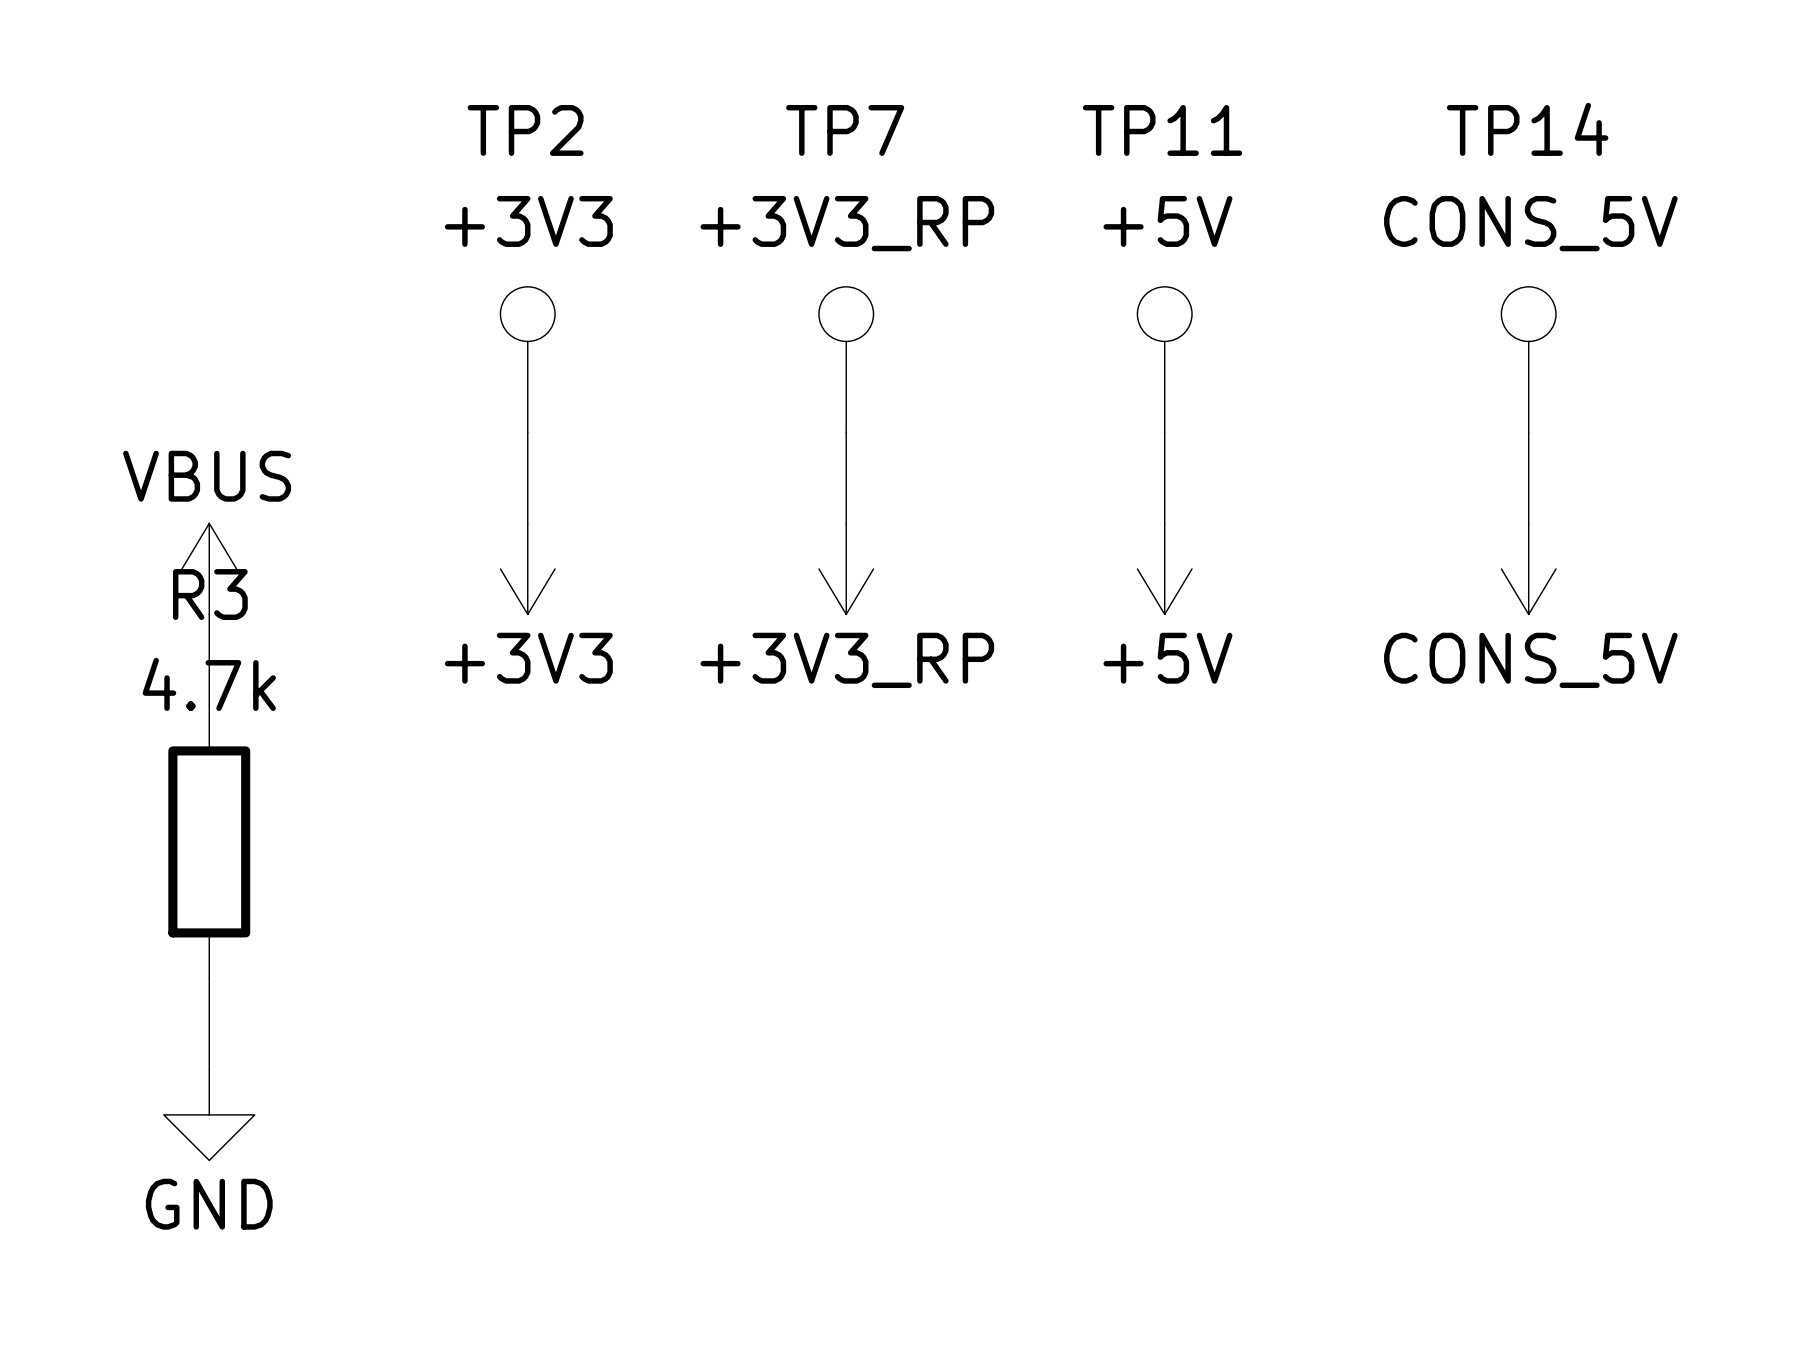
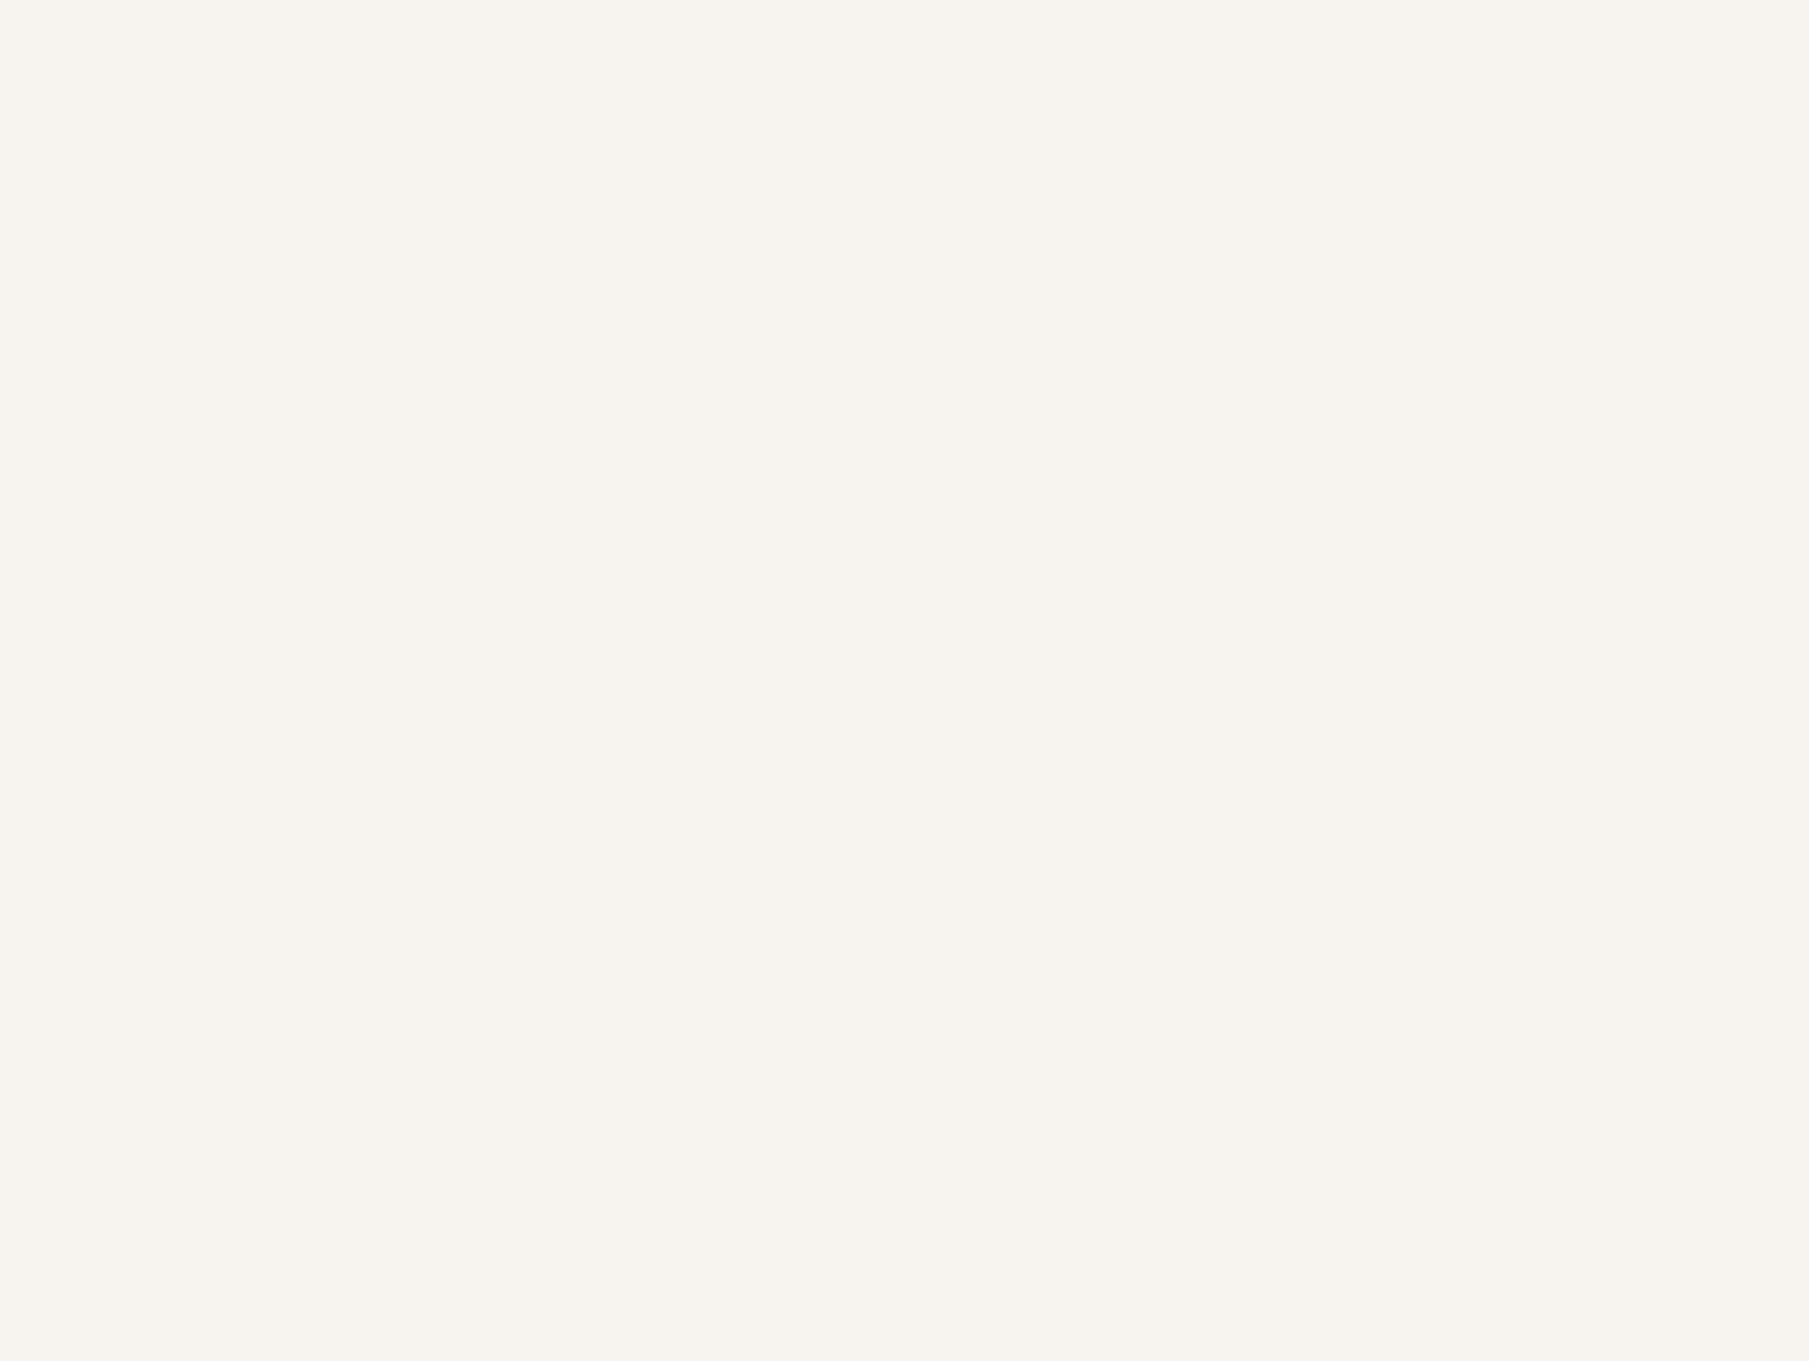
TP2: +3V3 (527, 359) -> none
TP7: +3V3_RP (846, 359) -> none
TP11: +5V (1164, 359) -> none
TP14: CONS_5V (1528, 359) -> none
wire: (527, 432) (527, 523) -> none
wire: (846, 432) (846, 523) -> none
wire: (1164, 432) (1164, 523) -> none
wire: (1528, 432) (1528, 523) -> none
power symbol: VBUS (209, 568) -> none
power symbol: +3V3 (527, 568) -> none
power symbol: +3V3_RP (846, 568) -> none
power symbol: +5V (1164, 568) -> none
power symbol: CONS_5V (1528, 568) -> none
wire: (209, 614) (209, 705) -> none
R3: 4.7k (209, 841) -> none
wire: (209, 978) (209, 1069) -> none
power symbol: GND (209, 1114) -> none

